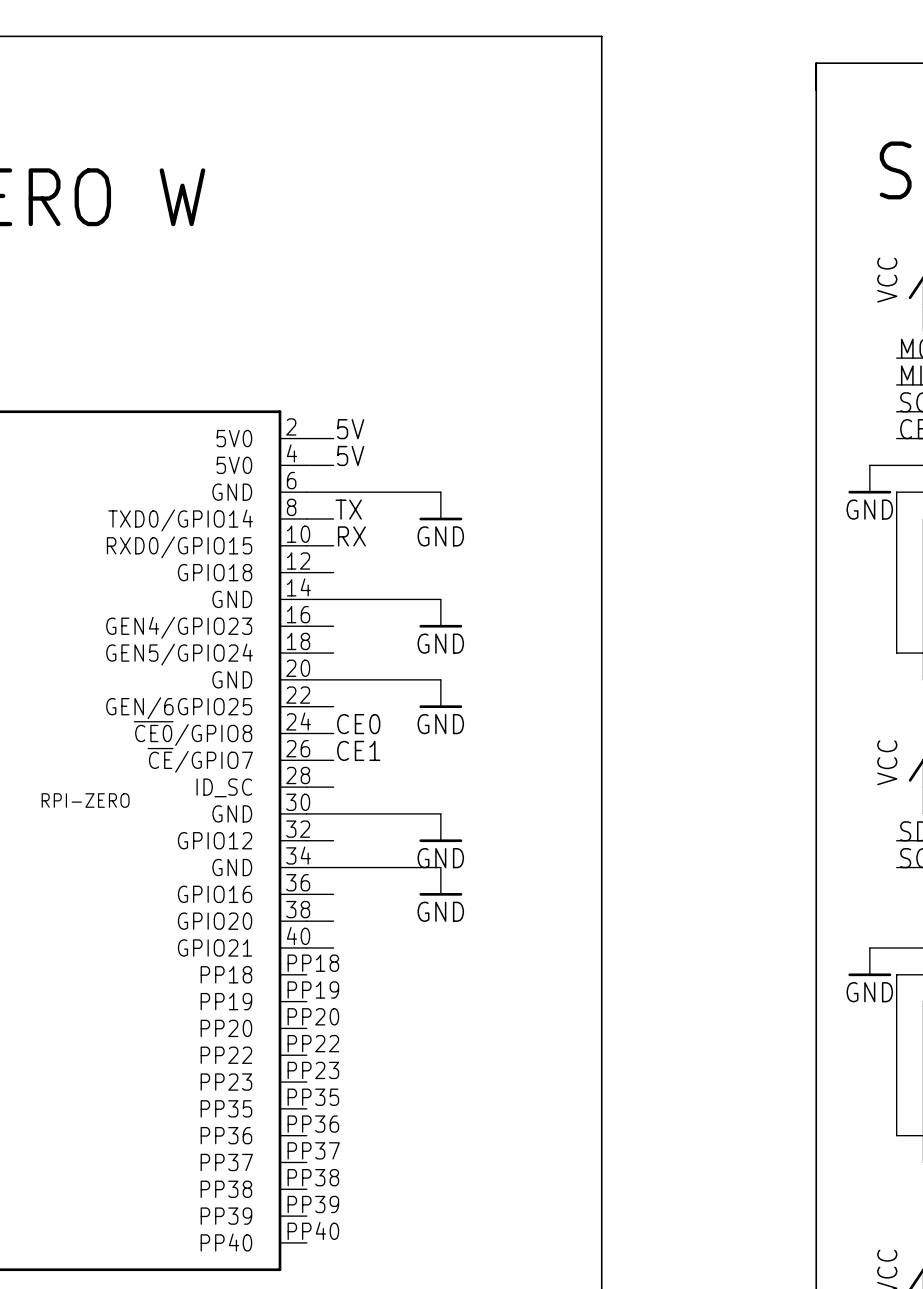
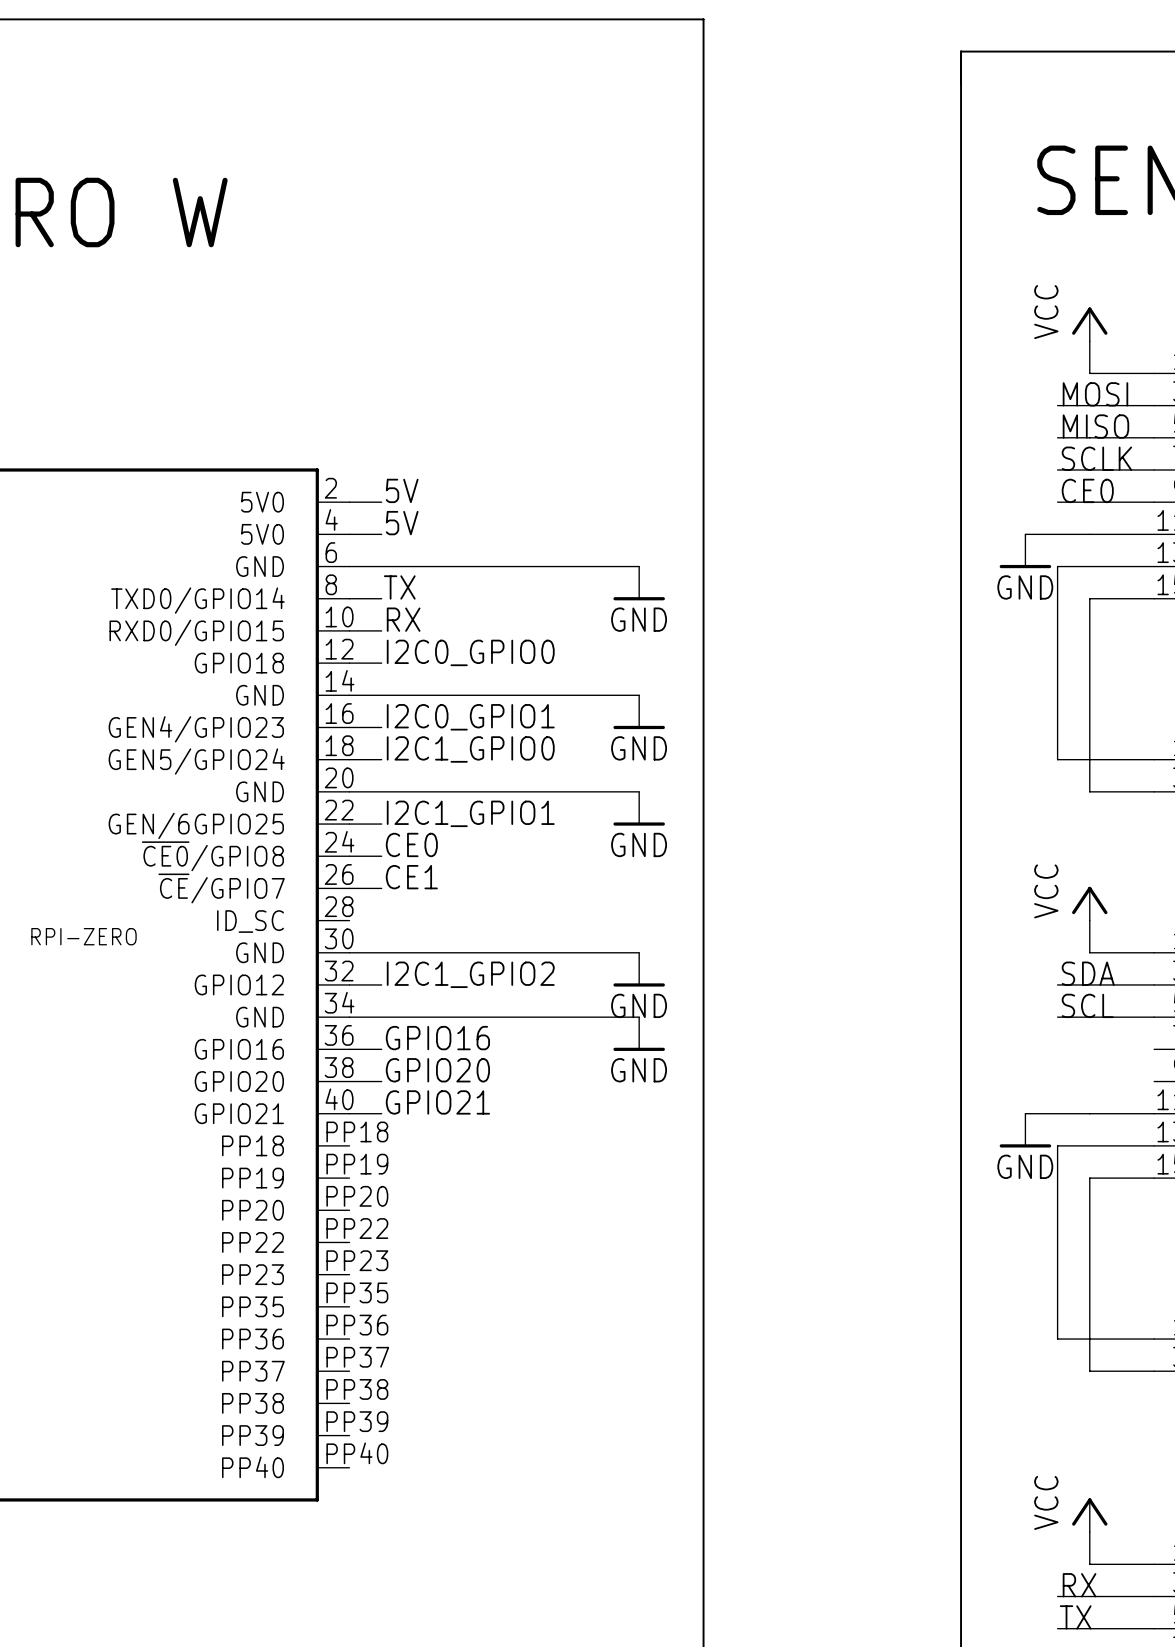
wire: none -> (510, 566) (639, 566)
power symbol: GND (440, 506) -> none
power symbol: none -> GND (639, 583)
label: none -> I2C0_GPIO0 (470, 652)
wire: none -> (510, 695) (639, 695)
power symbol: GND (440, 613) -> none
power symbol: none -> GND (639, 712)
label: none -> I2C0_GPIO1 (470, 717)
label: none -> I2C1_GPIO0 (470, 749)
wire: none -> (510, 791) (639, 791)
power symbol: GND (440, 693) -> none
power symbol: none -> GND (639, 808)
label: none -> I2C1_GPIO1 (470, 813)
wire: (306, 787) (333, 787) -> none
wire: none -> (510, 952) (639, 952)
power symbol: GND (440, 828) -> none
power symbol: none -> GND (639, 969)
label: none -> I2C1_GPIO2 (470, 974)
wire: none -> (510, 1017) (639, 1017)
power symbol: GND (440, 881) -> none
power symbol: none -> GND (639, 1034)
label: none -> GPIO16 (437, 1038)
label: none -> GPIO20 (437, 1070)
label: none -> GPIO21 (437, 1102)

